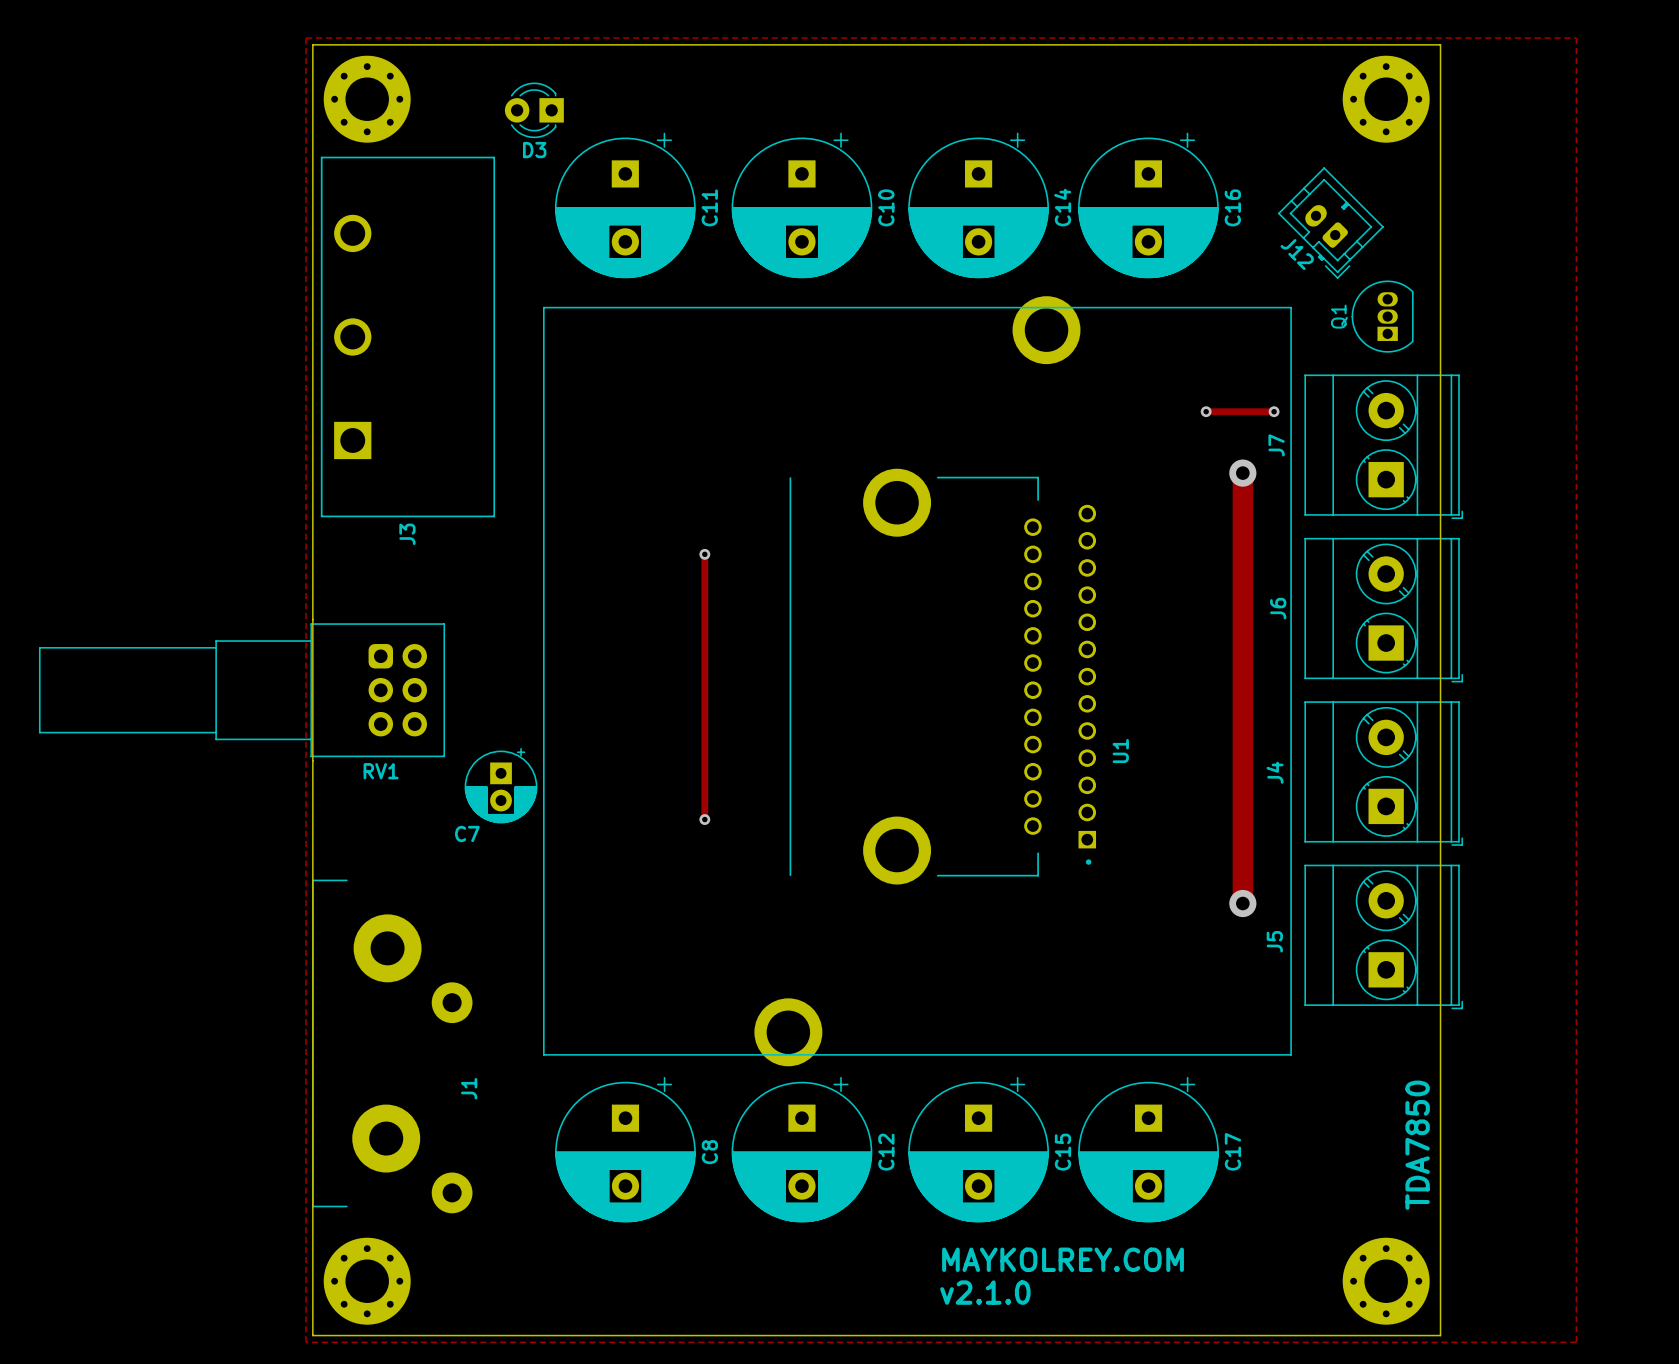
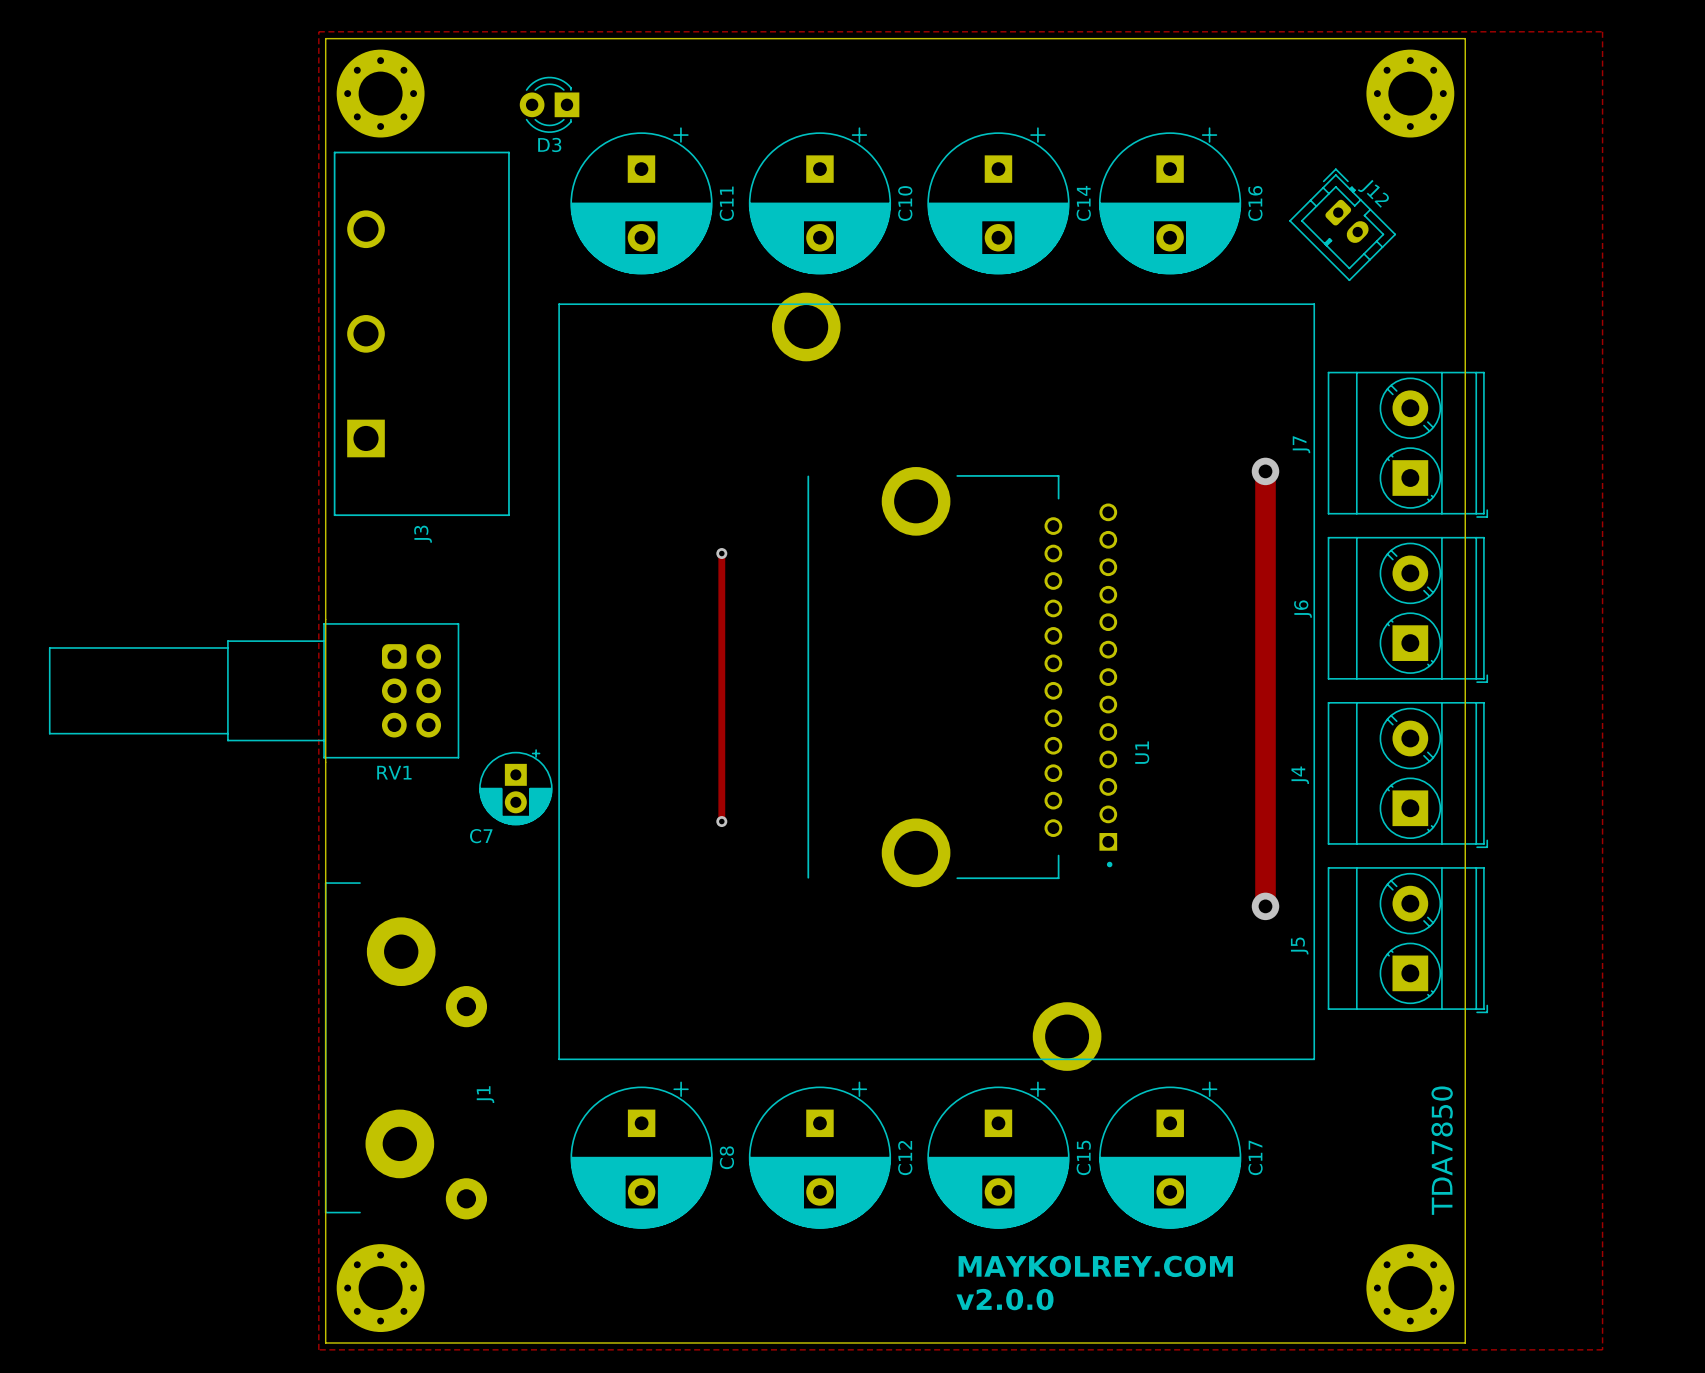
J12 rotation: 0° (1330, 223) -> 180° (1342, 224)
part footprint: [543, 296, 1292, 1067] -> [558, 292, 1316, 1071]
Q1: (1382, 316) -> none
track: (1206, 411) (1274, 411) -> none
via: (1206, 411) -> none
via: (1274, 411) -> none
text: v2.1.0 (985, 1292) -> v2.0.0 (1004, 1299)

